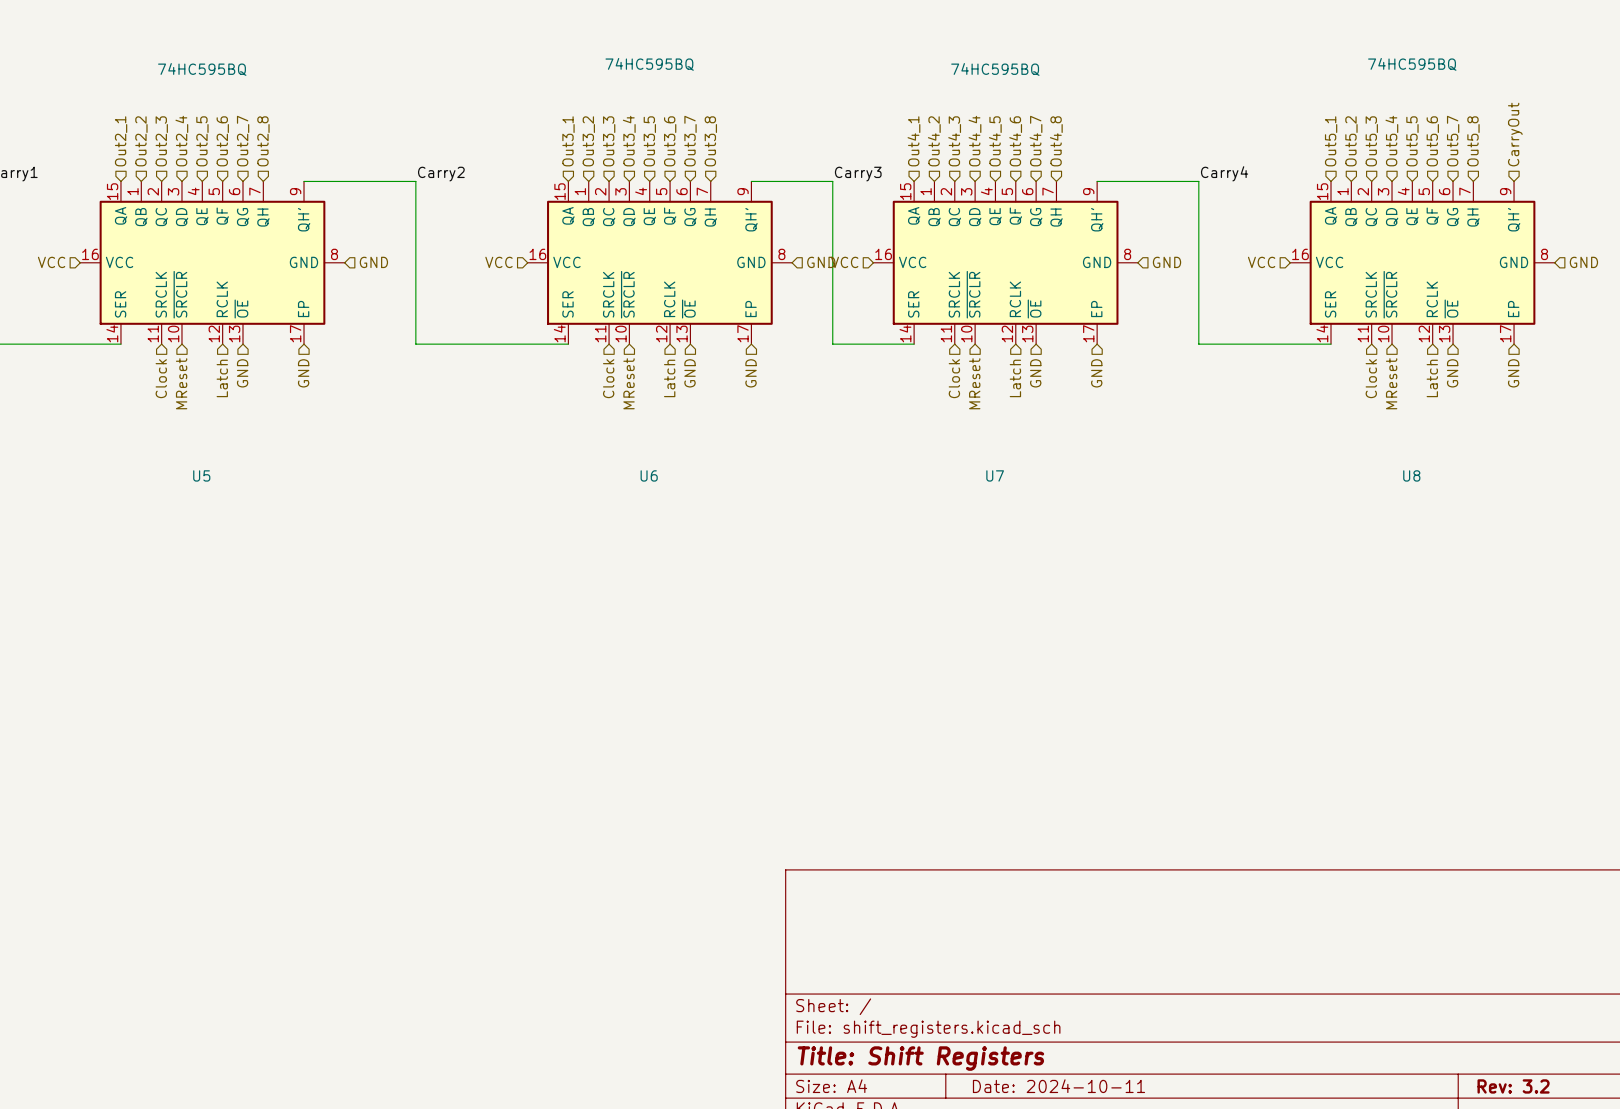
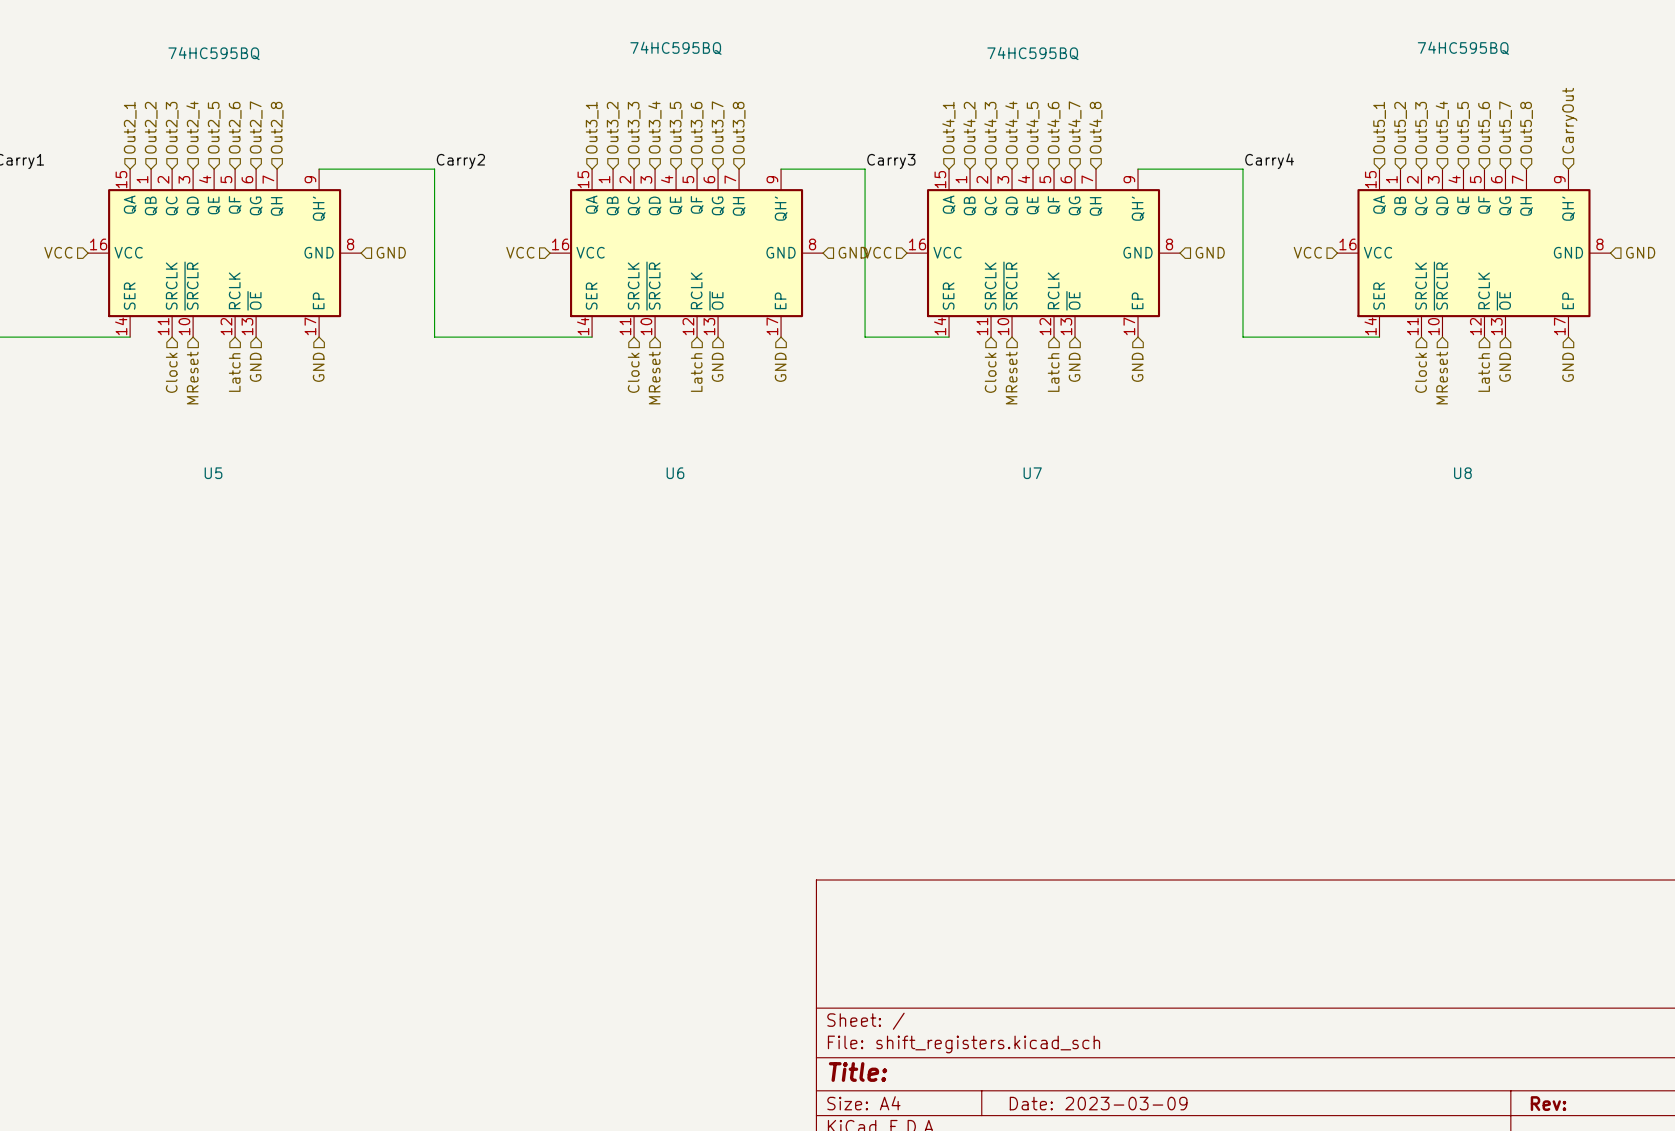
title block: Title: Shift Registers (920, 1058) -> Title: (858, 1072)
title block: Date: 2024-10-11 (1058, 1086) -> Date: 2023-03-09 (1098, 1103)
title block: Rev: 3.2 (1513, 1086) -> Rev: (1548, 1103)

